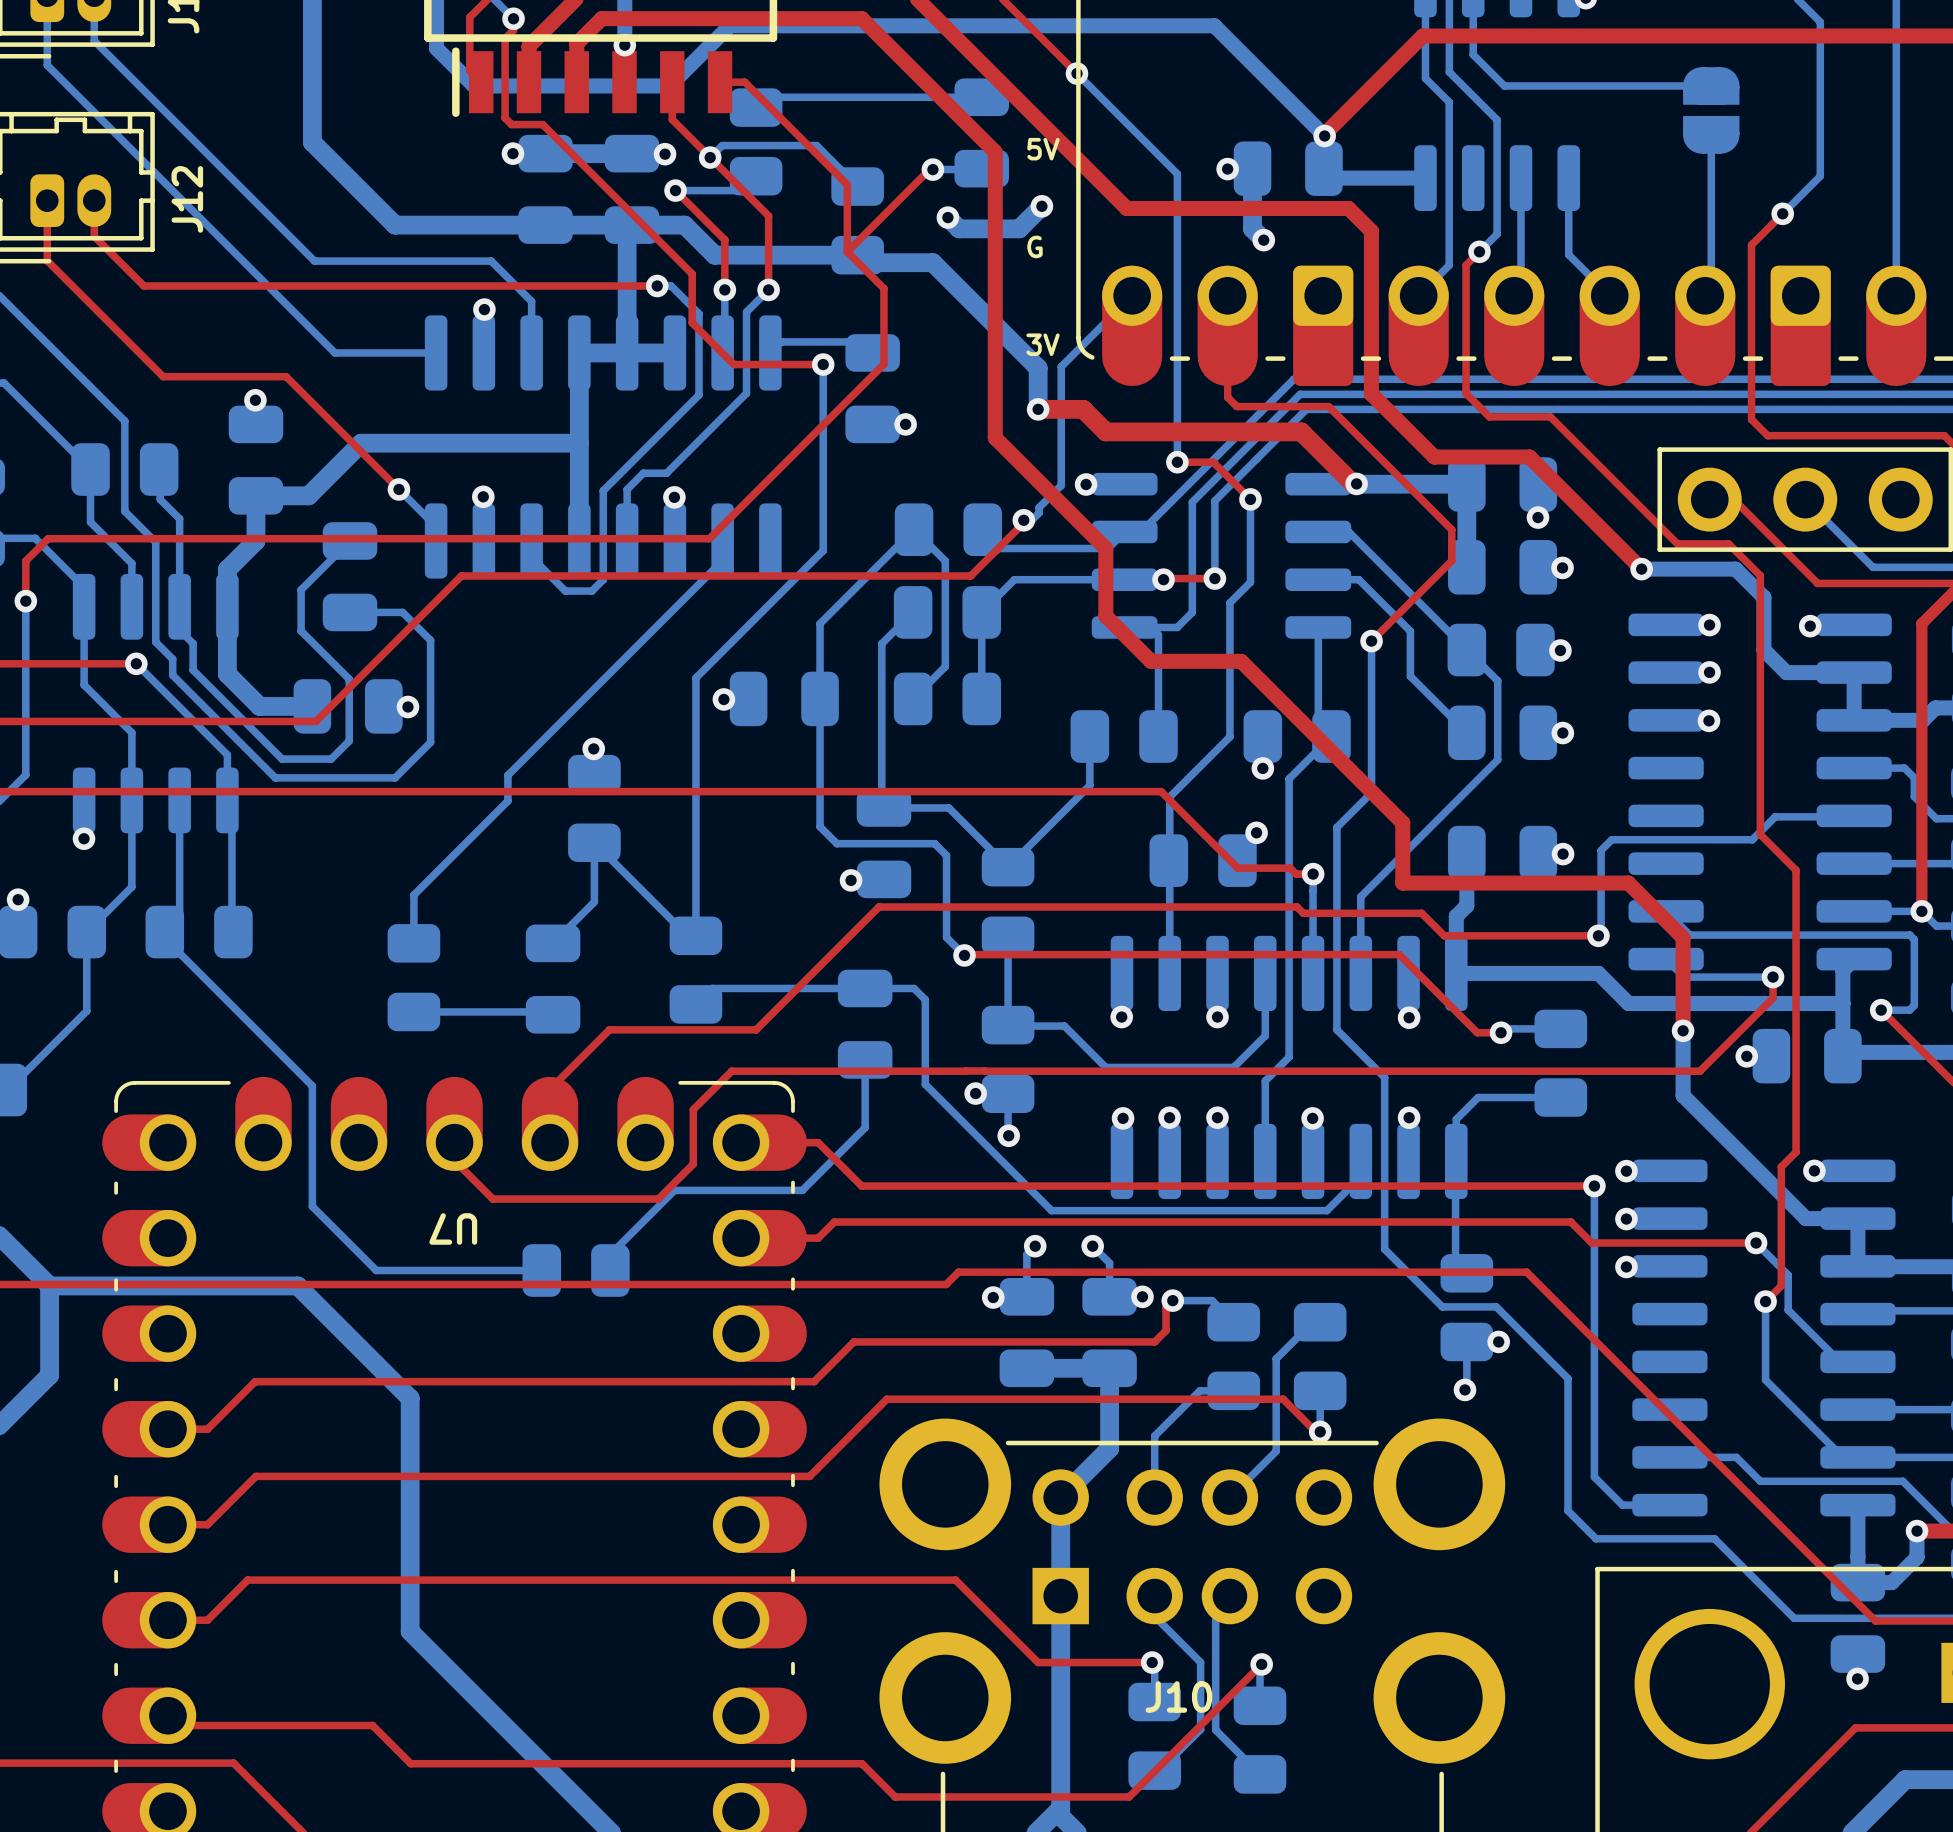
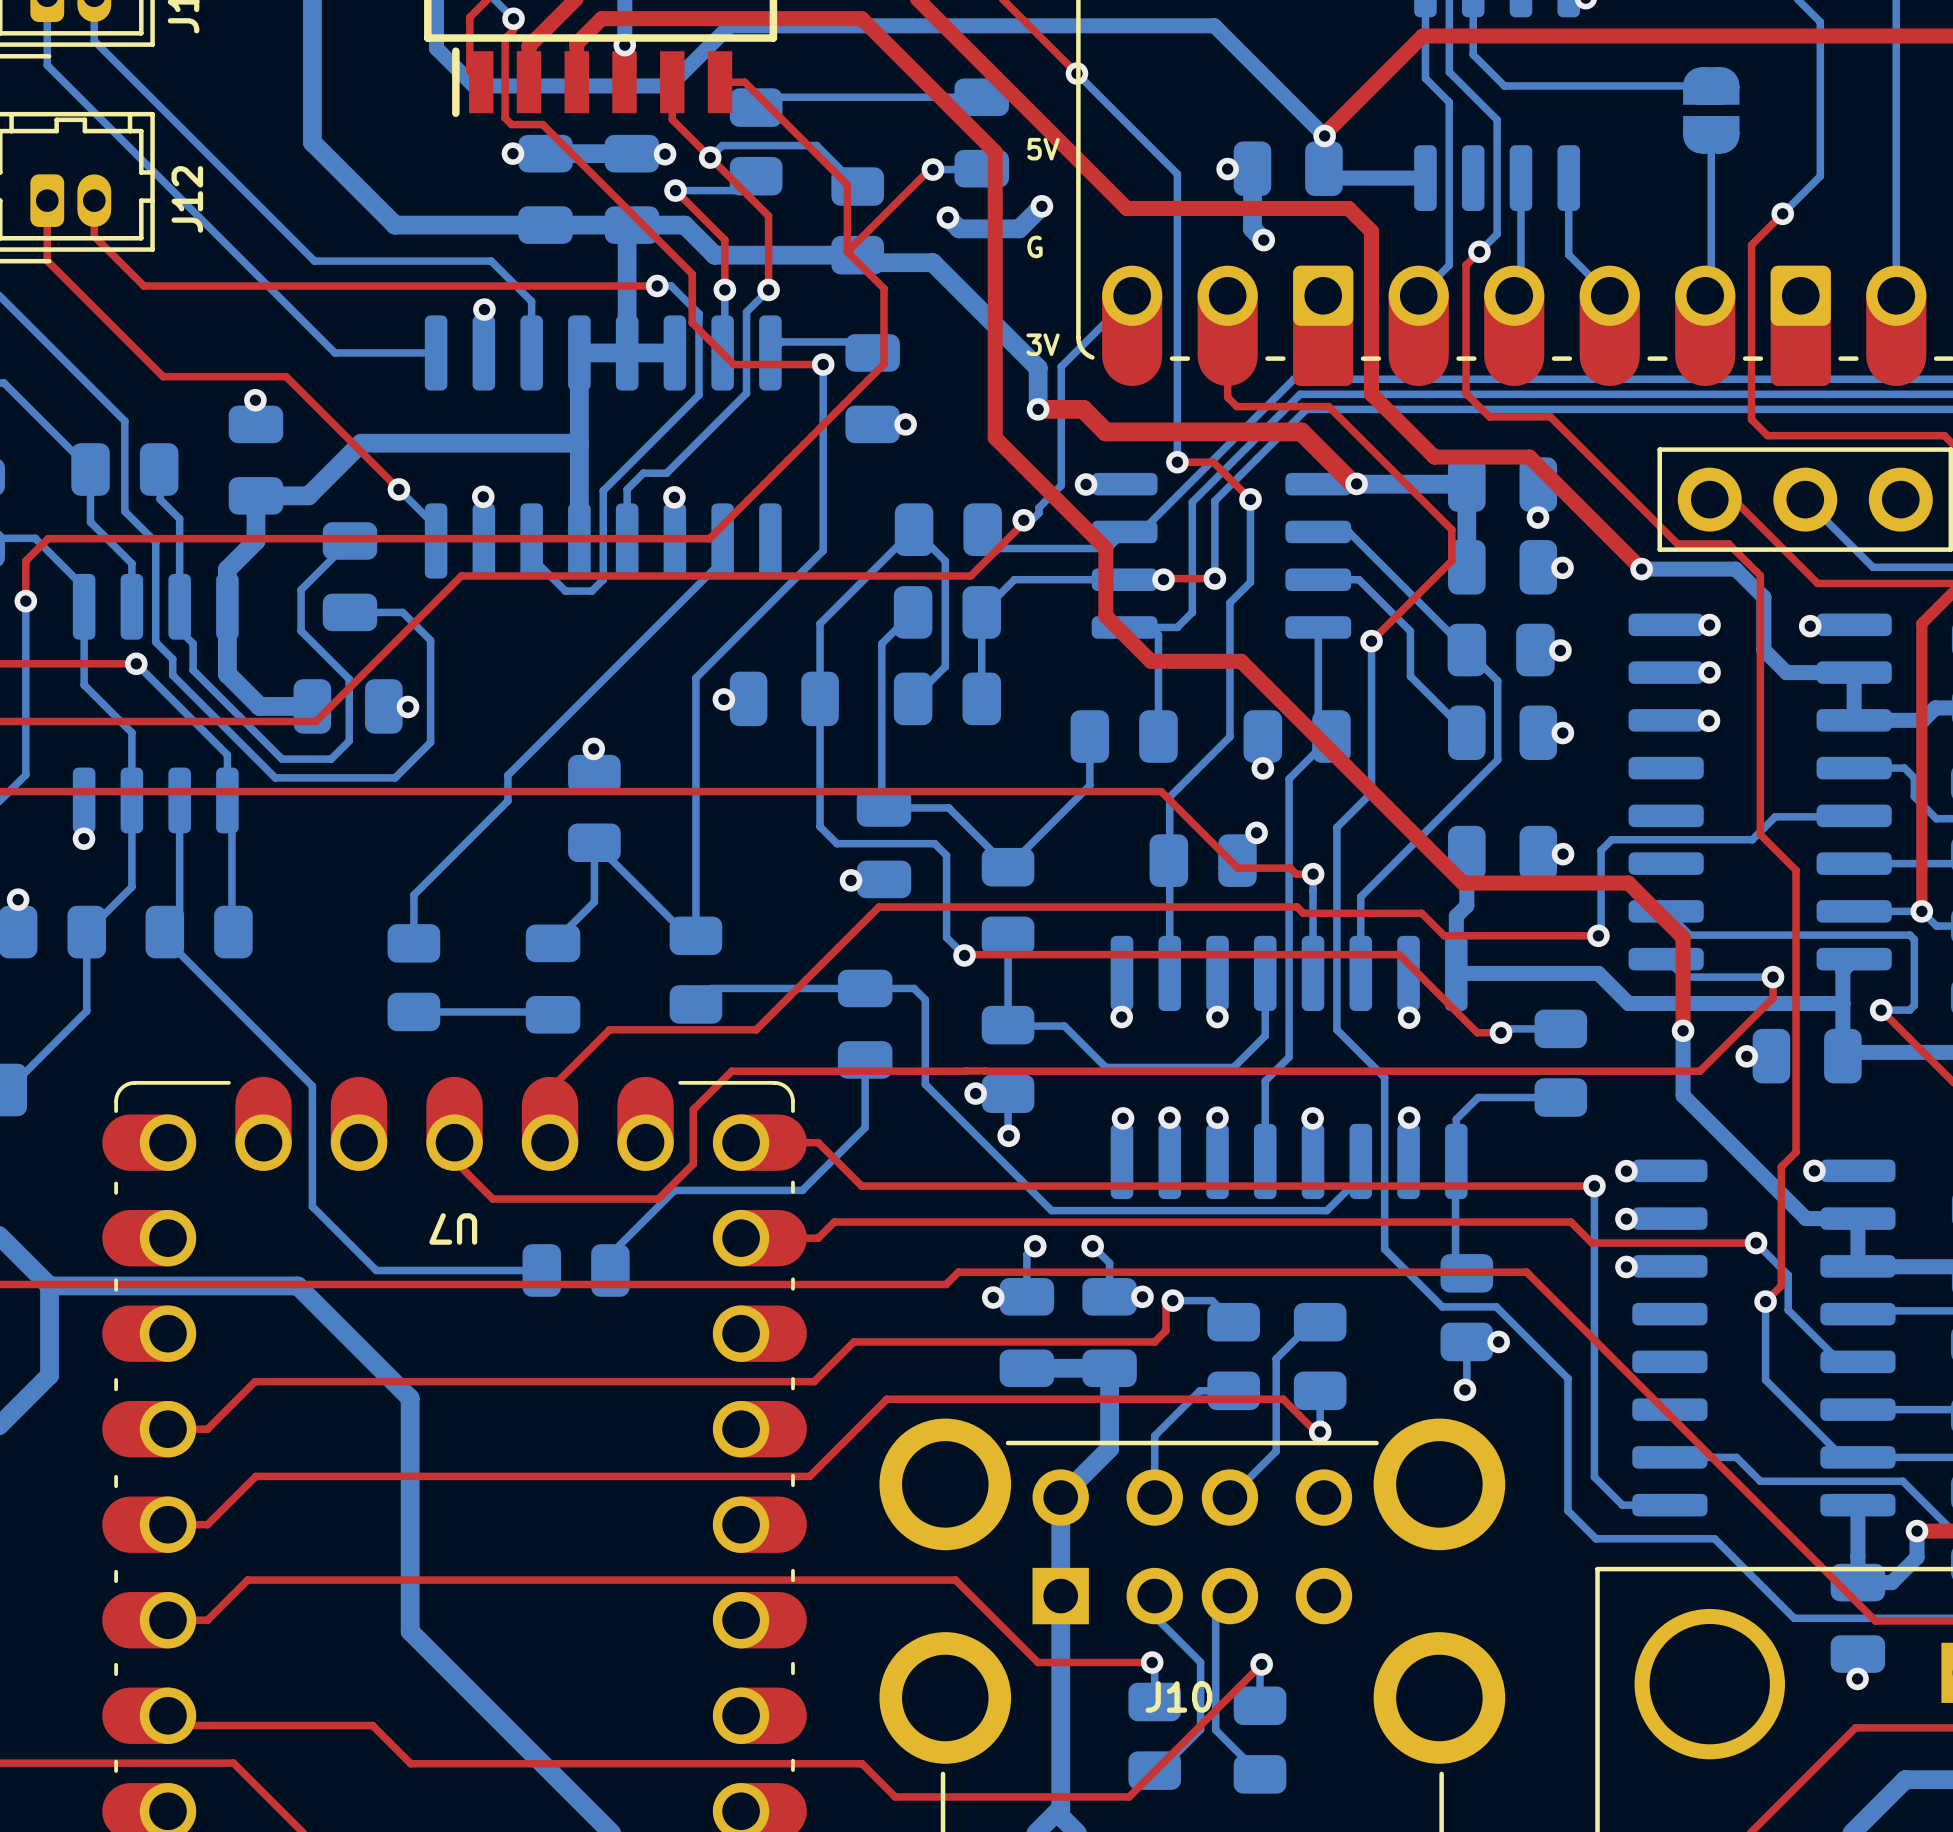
top track: (1402, 822) (1402, 883) (1462, 883) -> (1402, 822) (1462, 883)

